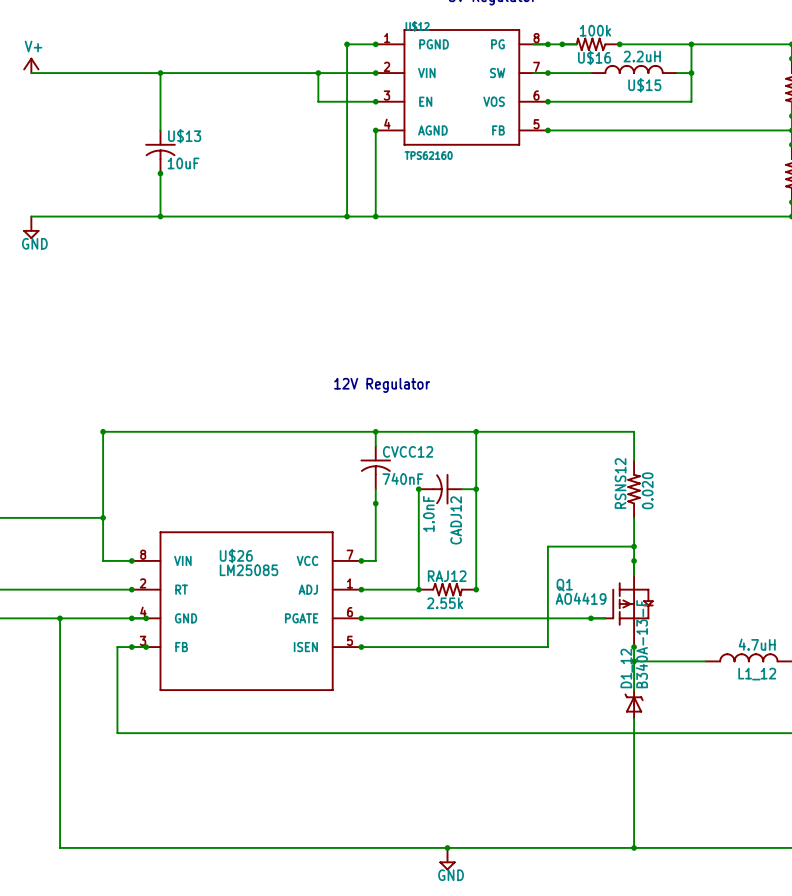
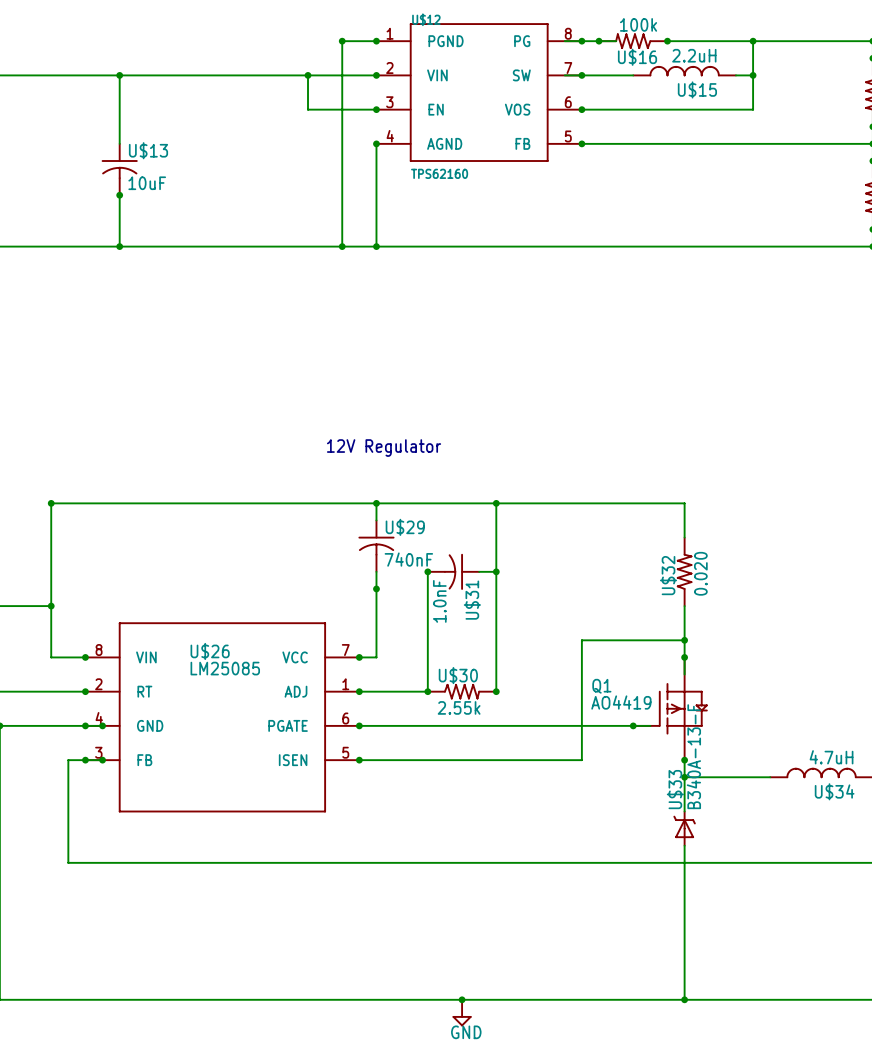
CVCC12 name: CVCC12 (408, 451) -> U$29 (405, 527)
RSNS12 name: RSNS12 (620, 483) -> U$32 (668, 575)
CADJ12 name: CADJ12 (456, 520) -> U$31 (472, 600)
RAJ12 name: RAJ12 (447, 576) -> U$30 (458, 675)
D1_12 name: D1_12 (626, 668) -> U$33 (675, 789)
L1_12 name: L1_12 (757, 674) -> U$34 (834, 791)

